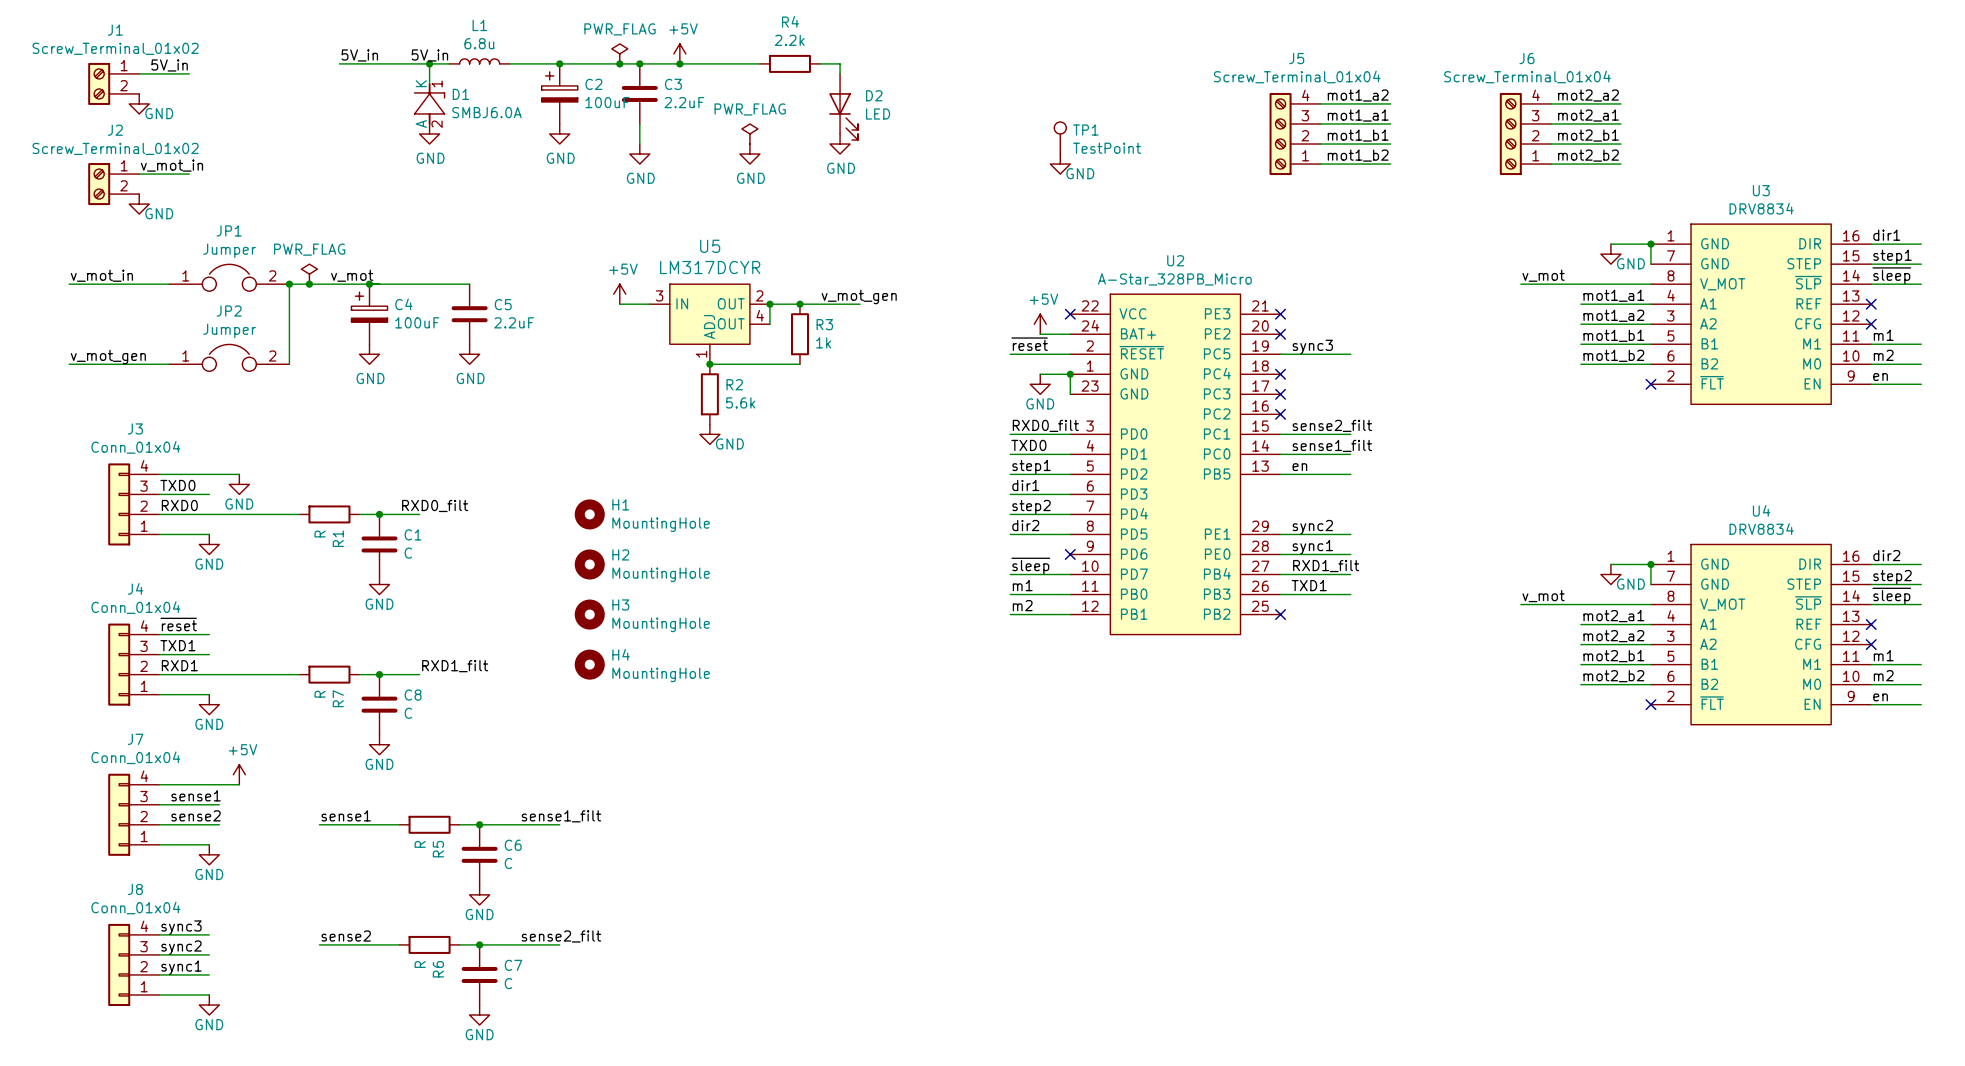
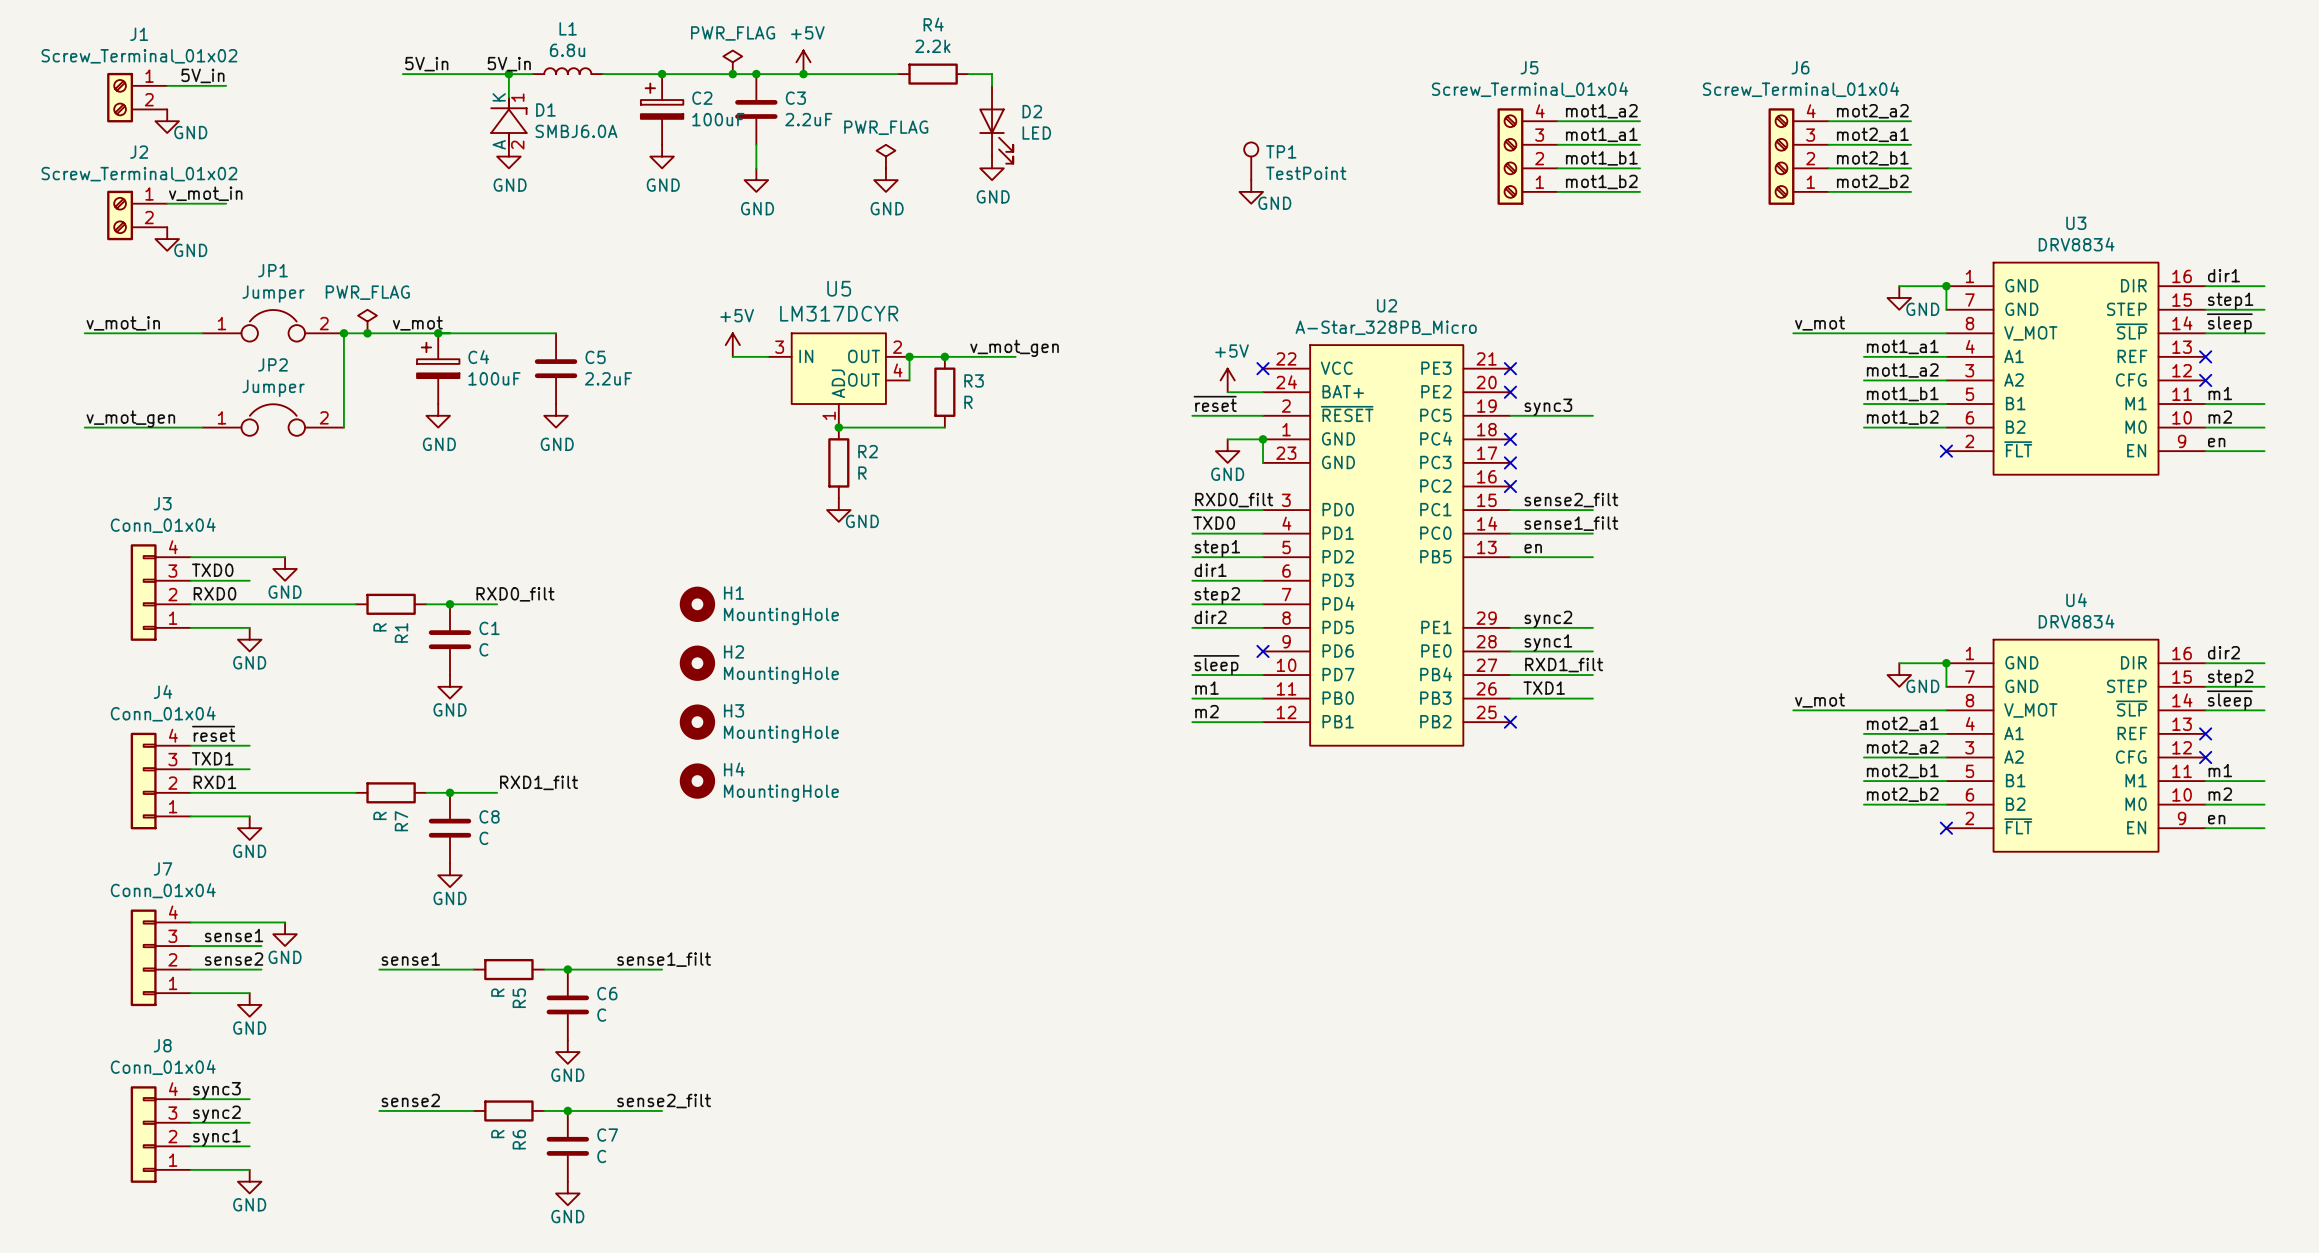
R3 value: 1k (823, 342) -> R (968, 402)
R2 value: 5.6k (740, 402) -> R (862, 473)
power symbol: +5V (239, 774) -> none
power symbol: none -> GND (285, 934)

